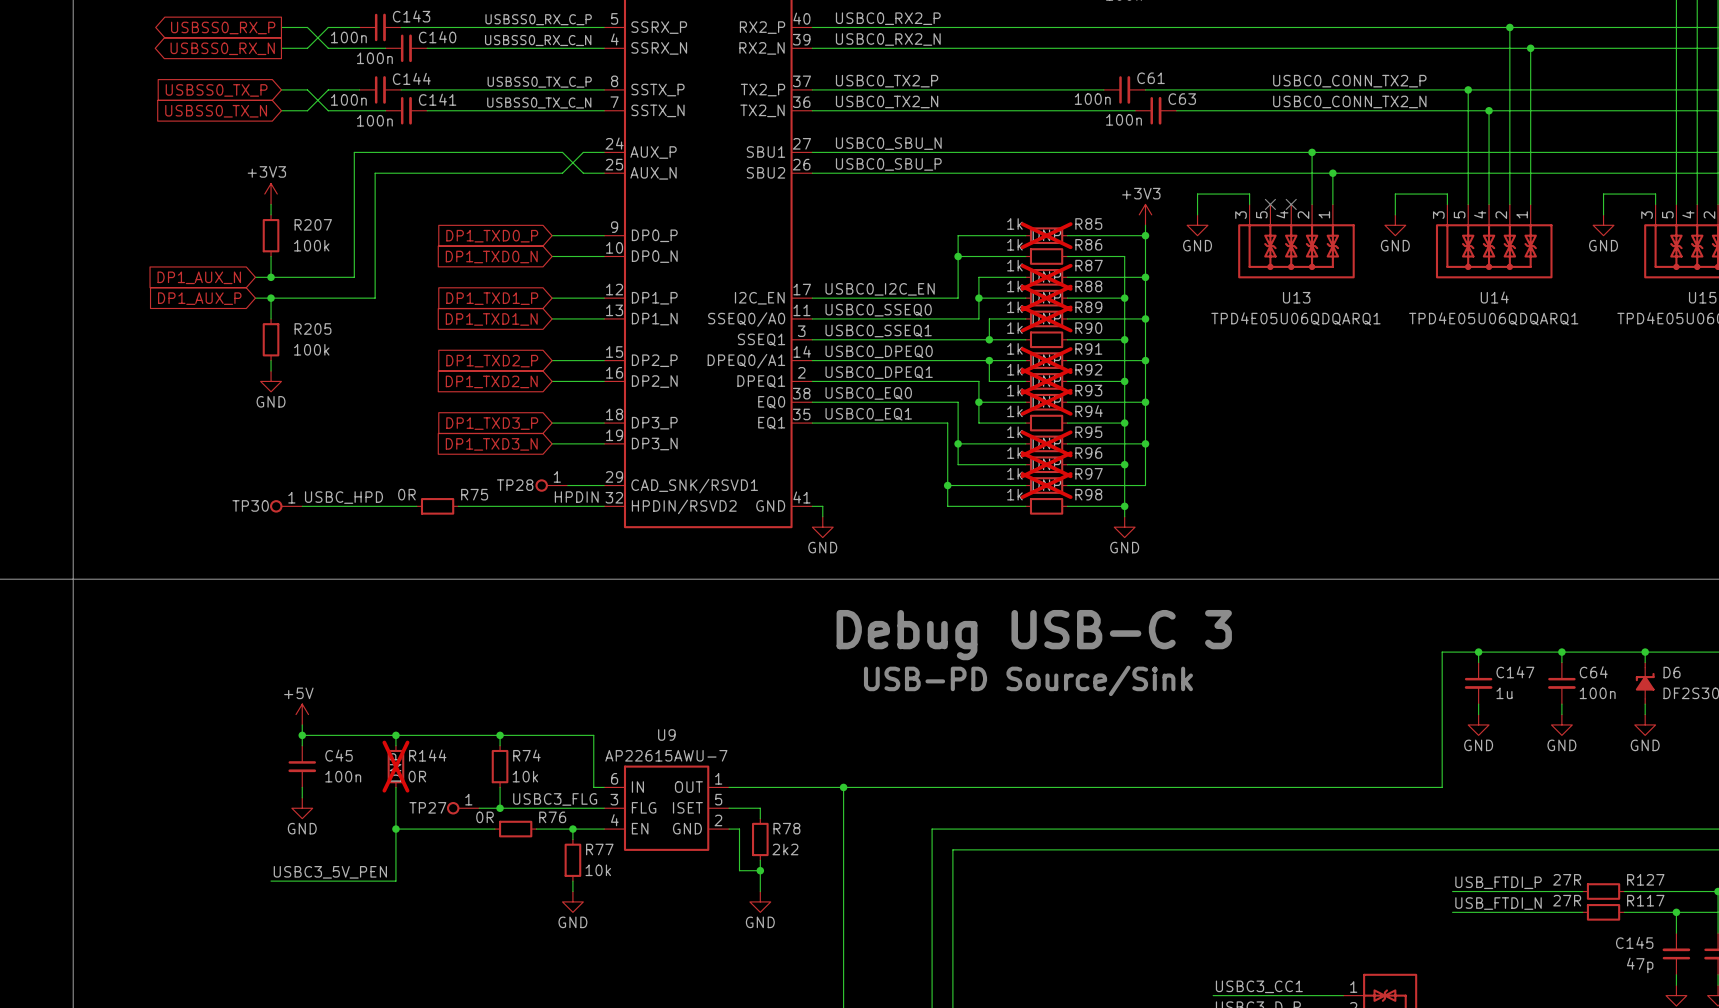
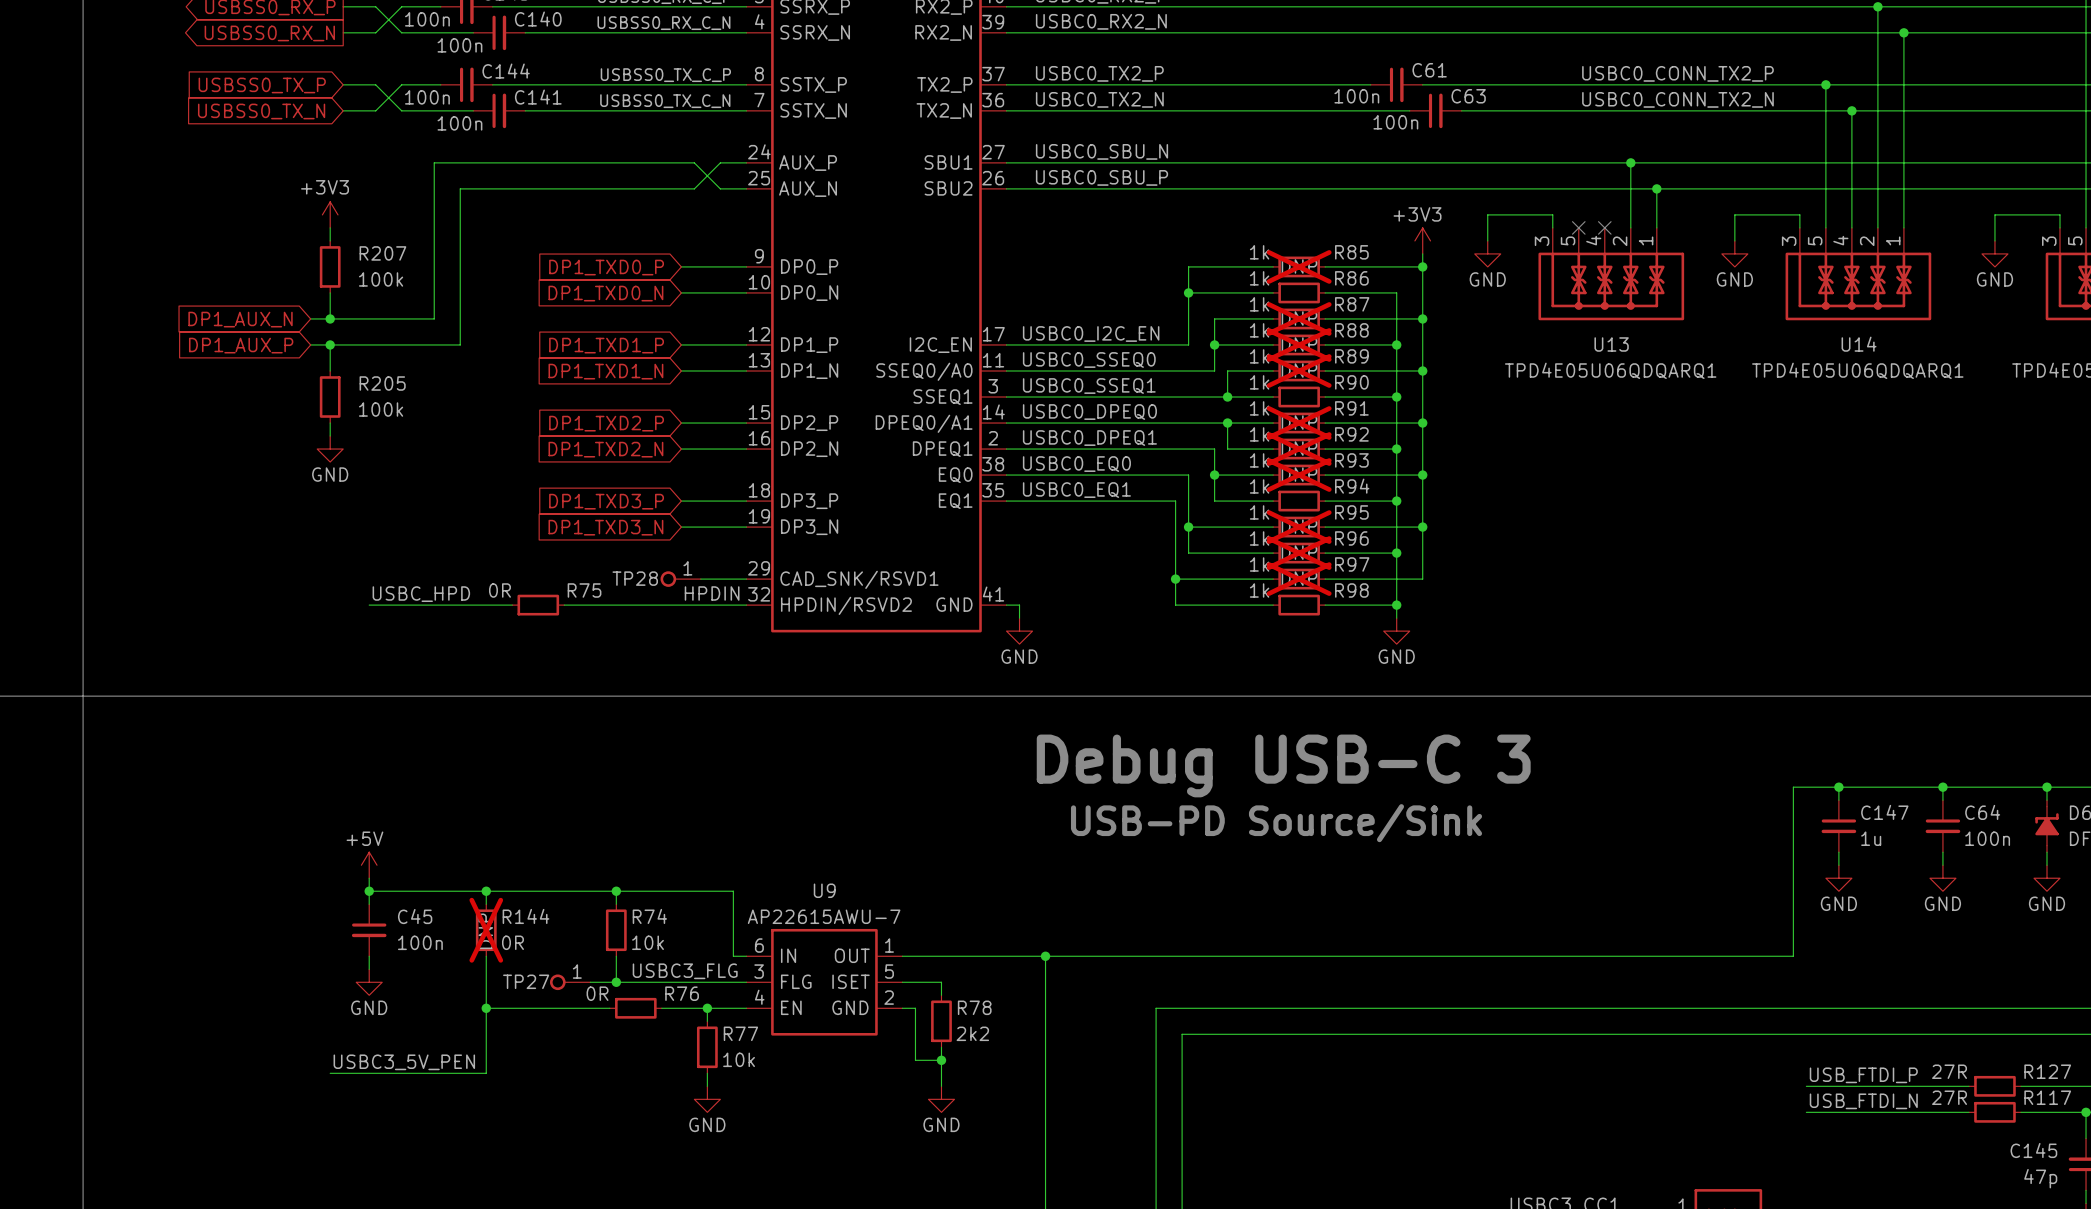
TP30: (286, 506) -> none

